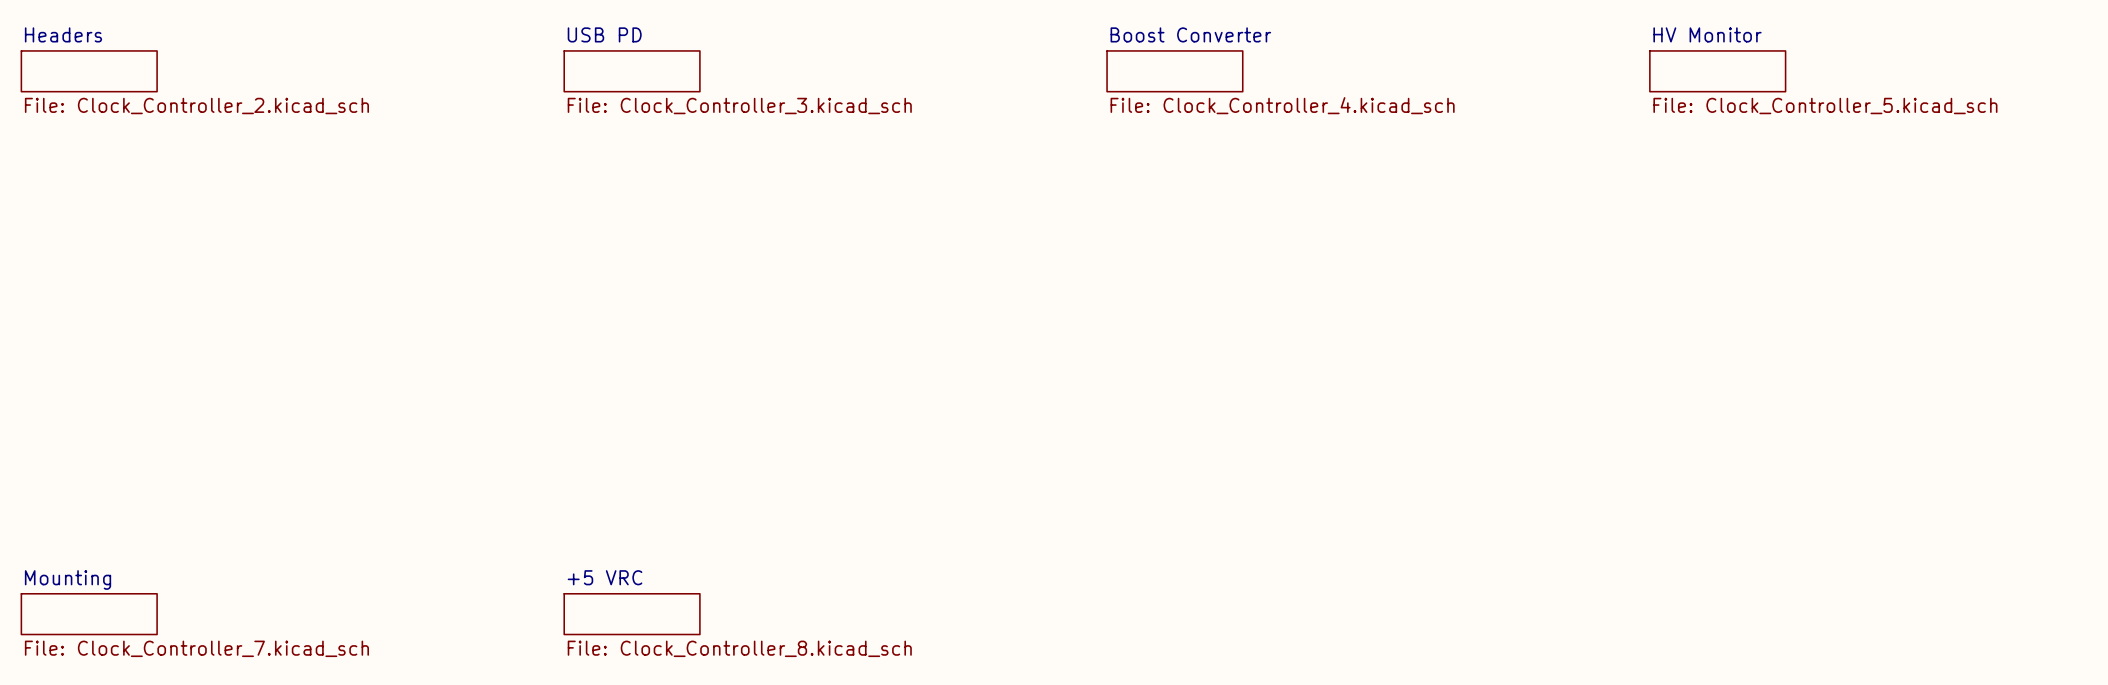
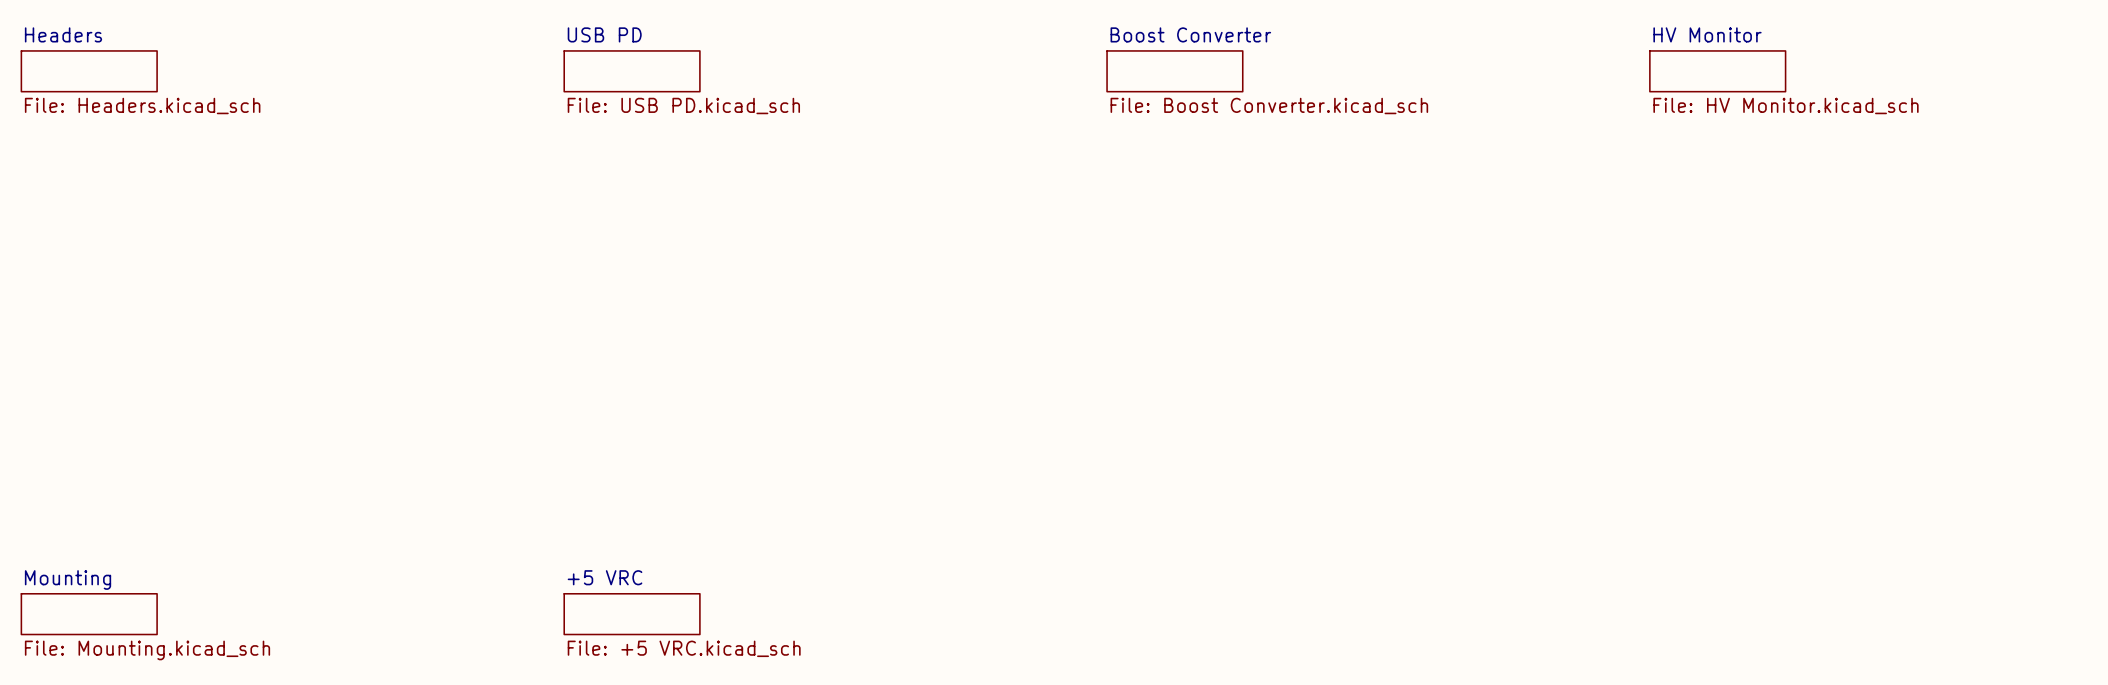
sheet Boost Converter value: File: Clock_Controller_4.kicad_sch (1282, 105) -> File: Boost Converter.kicad_sch (1269, 106)
sheet Headers value: File: Clock_Controller_2.kicad_sch (196, 106) -> File: Headers.kicad_sch (142, 106)
sheet USB PD value: File: Clock_Controller_3.kicad_sch (739, 106) -> File: USB PD.kicad_sch (683, 106)
sheet HV Monitor value: File: Clock_Controller_5.kicad_sch (1825, 106) -> File: HV Monitor.kicad_sch (1786, 106)
sheet Mounting value: File: Clock_Controller_7.kicad_sch (196, 648) -> File: Mounting.kicad_sch (147, 650)
sheet +5 VRC value: File: Clock_Controller_8.kicad_sch (739, 648) -> File: +5 VRC.kicad_sch (684, 648)

